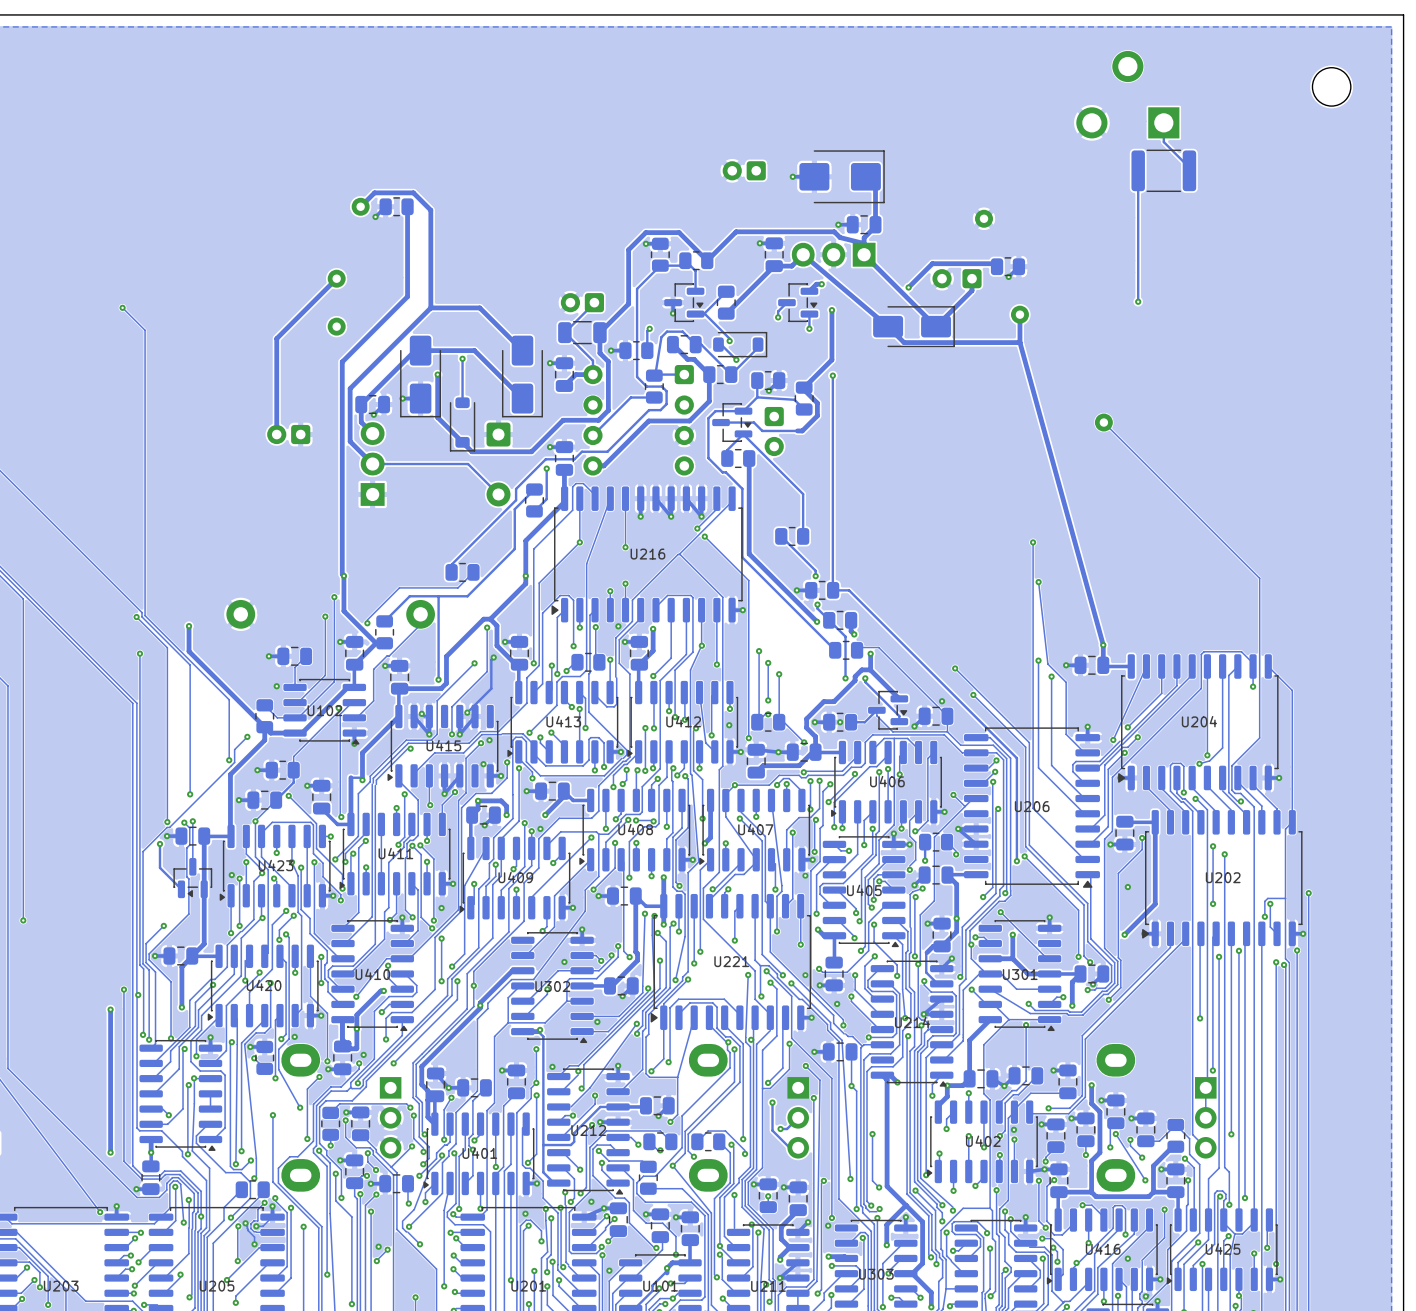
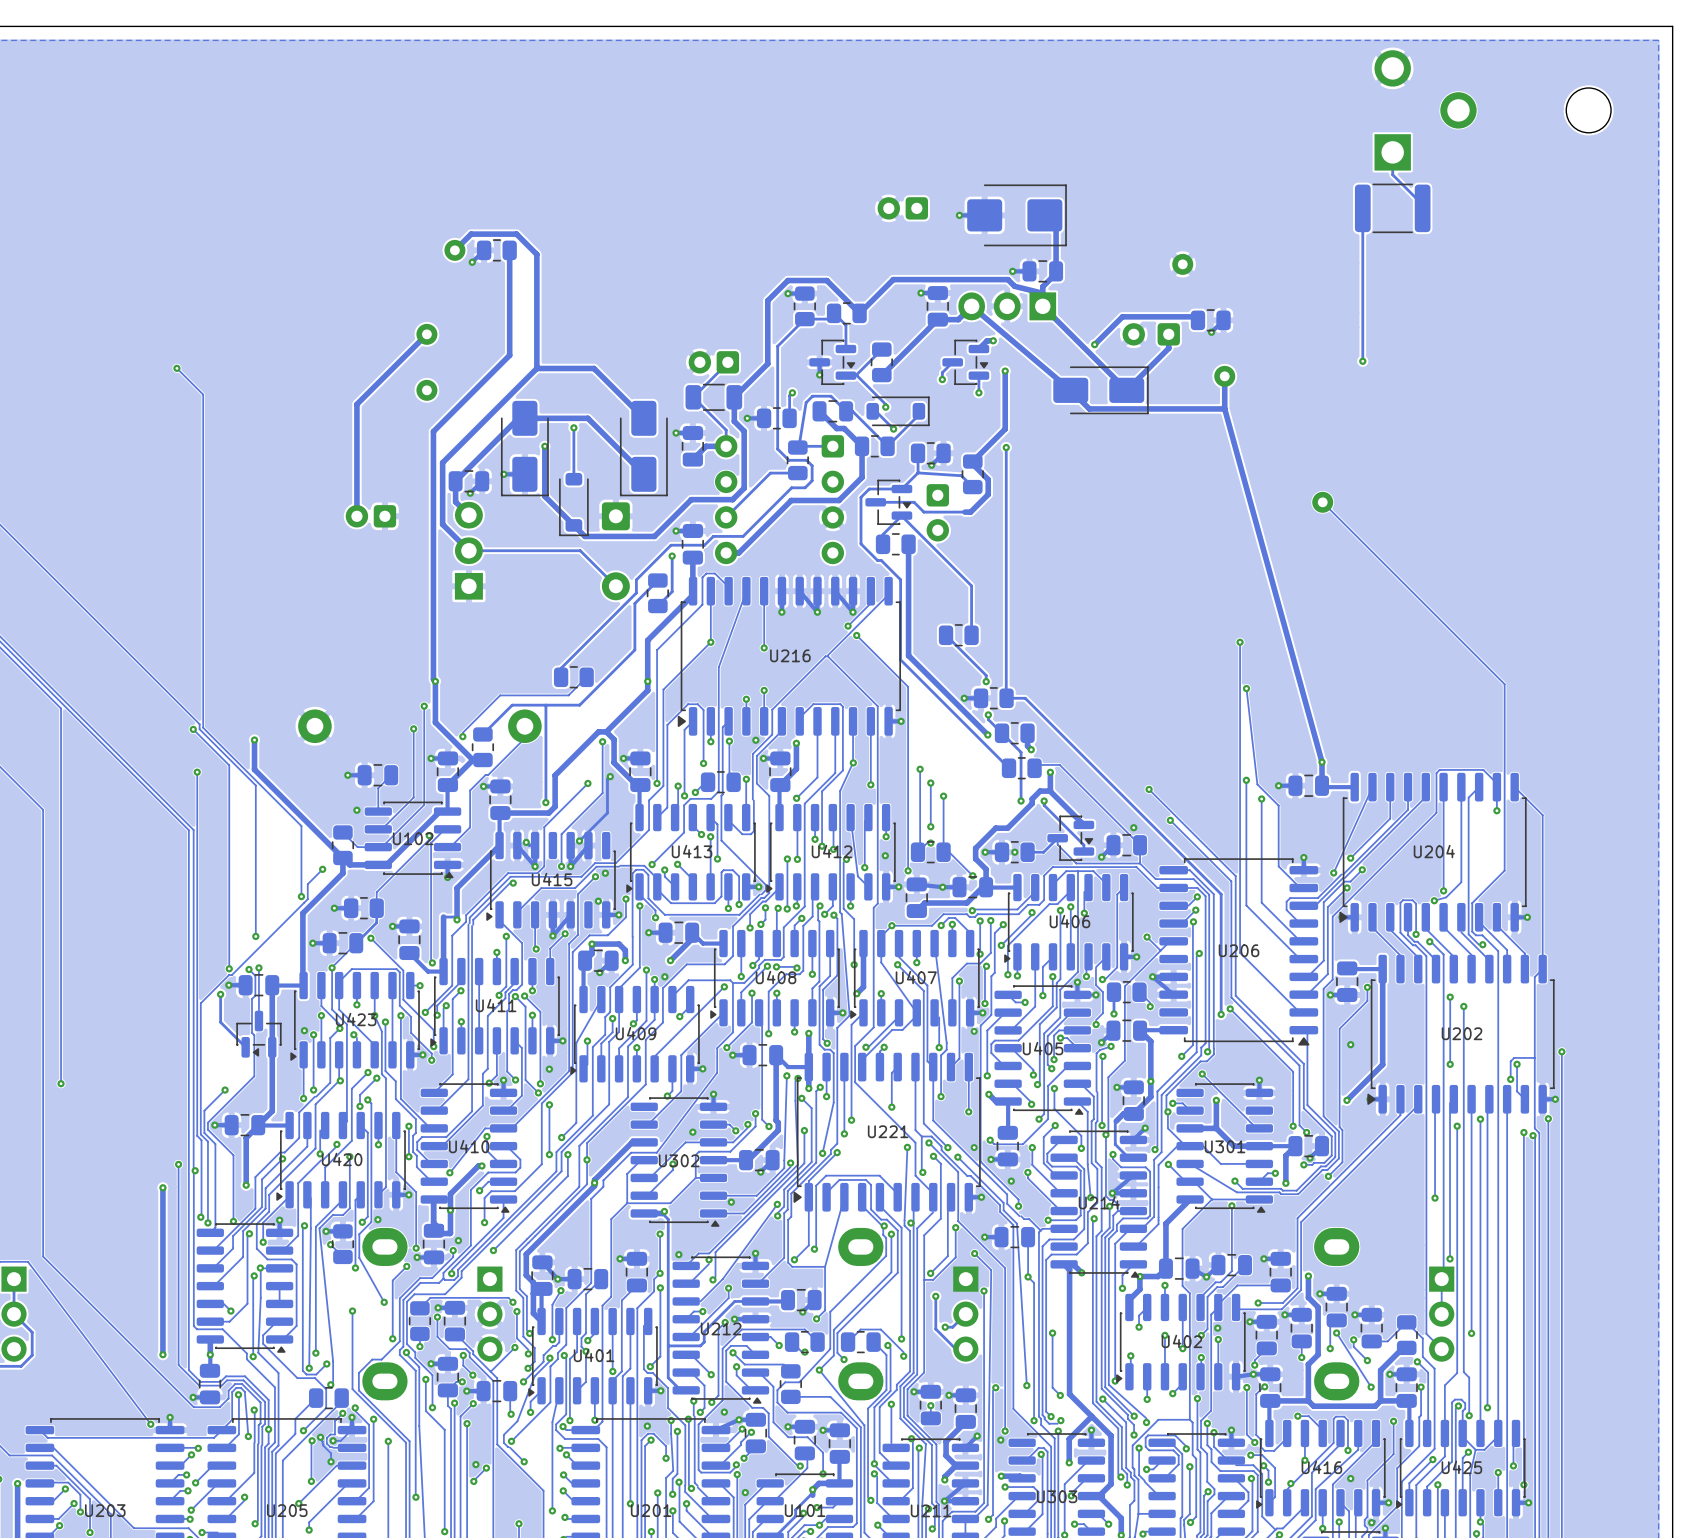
part rotation: 0° (1127, 94) -> 90° clockwise (1425, 110)
part position: (1127, 94) -> (1425, 110)

